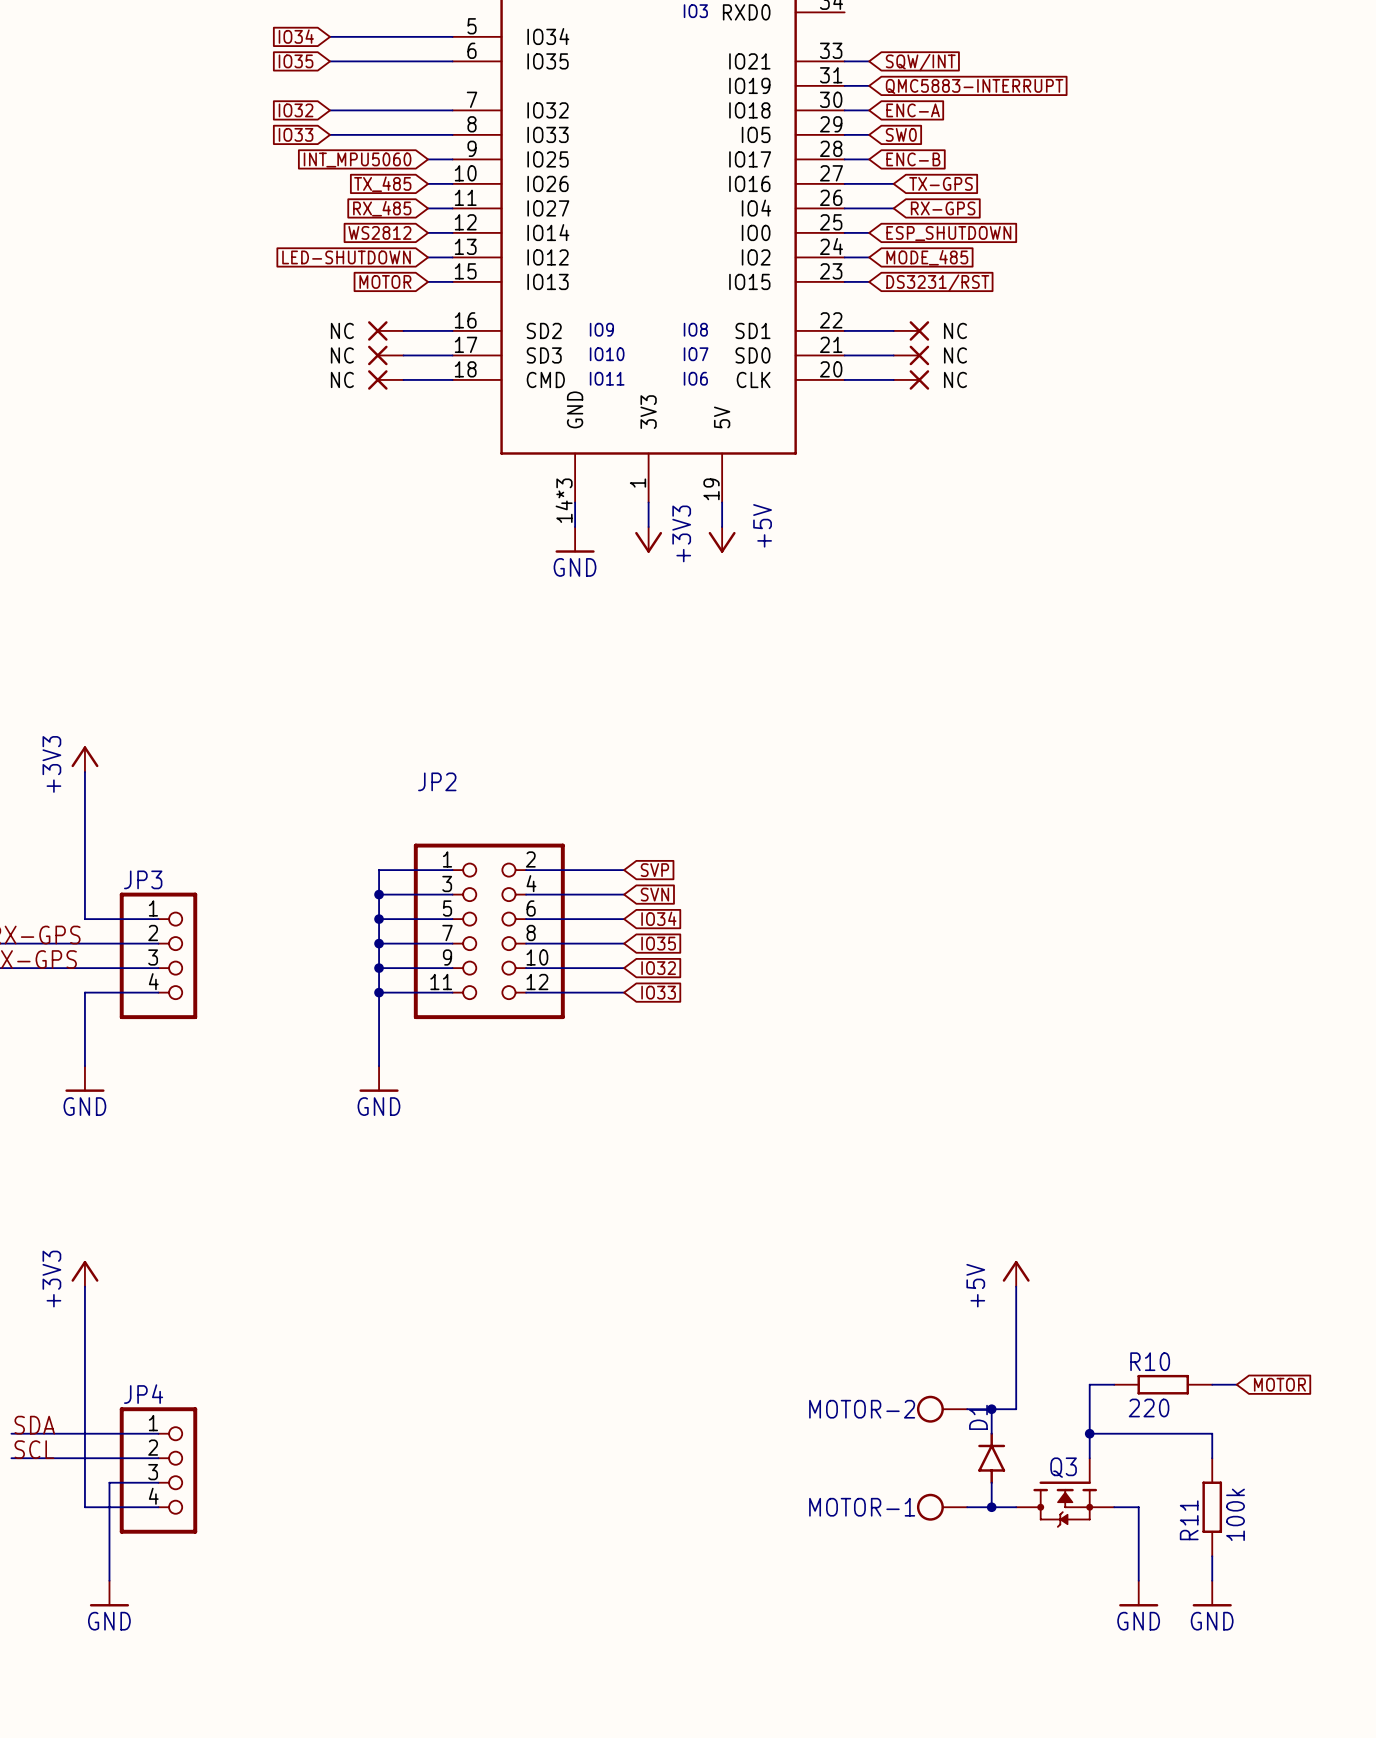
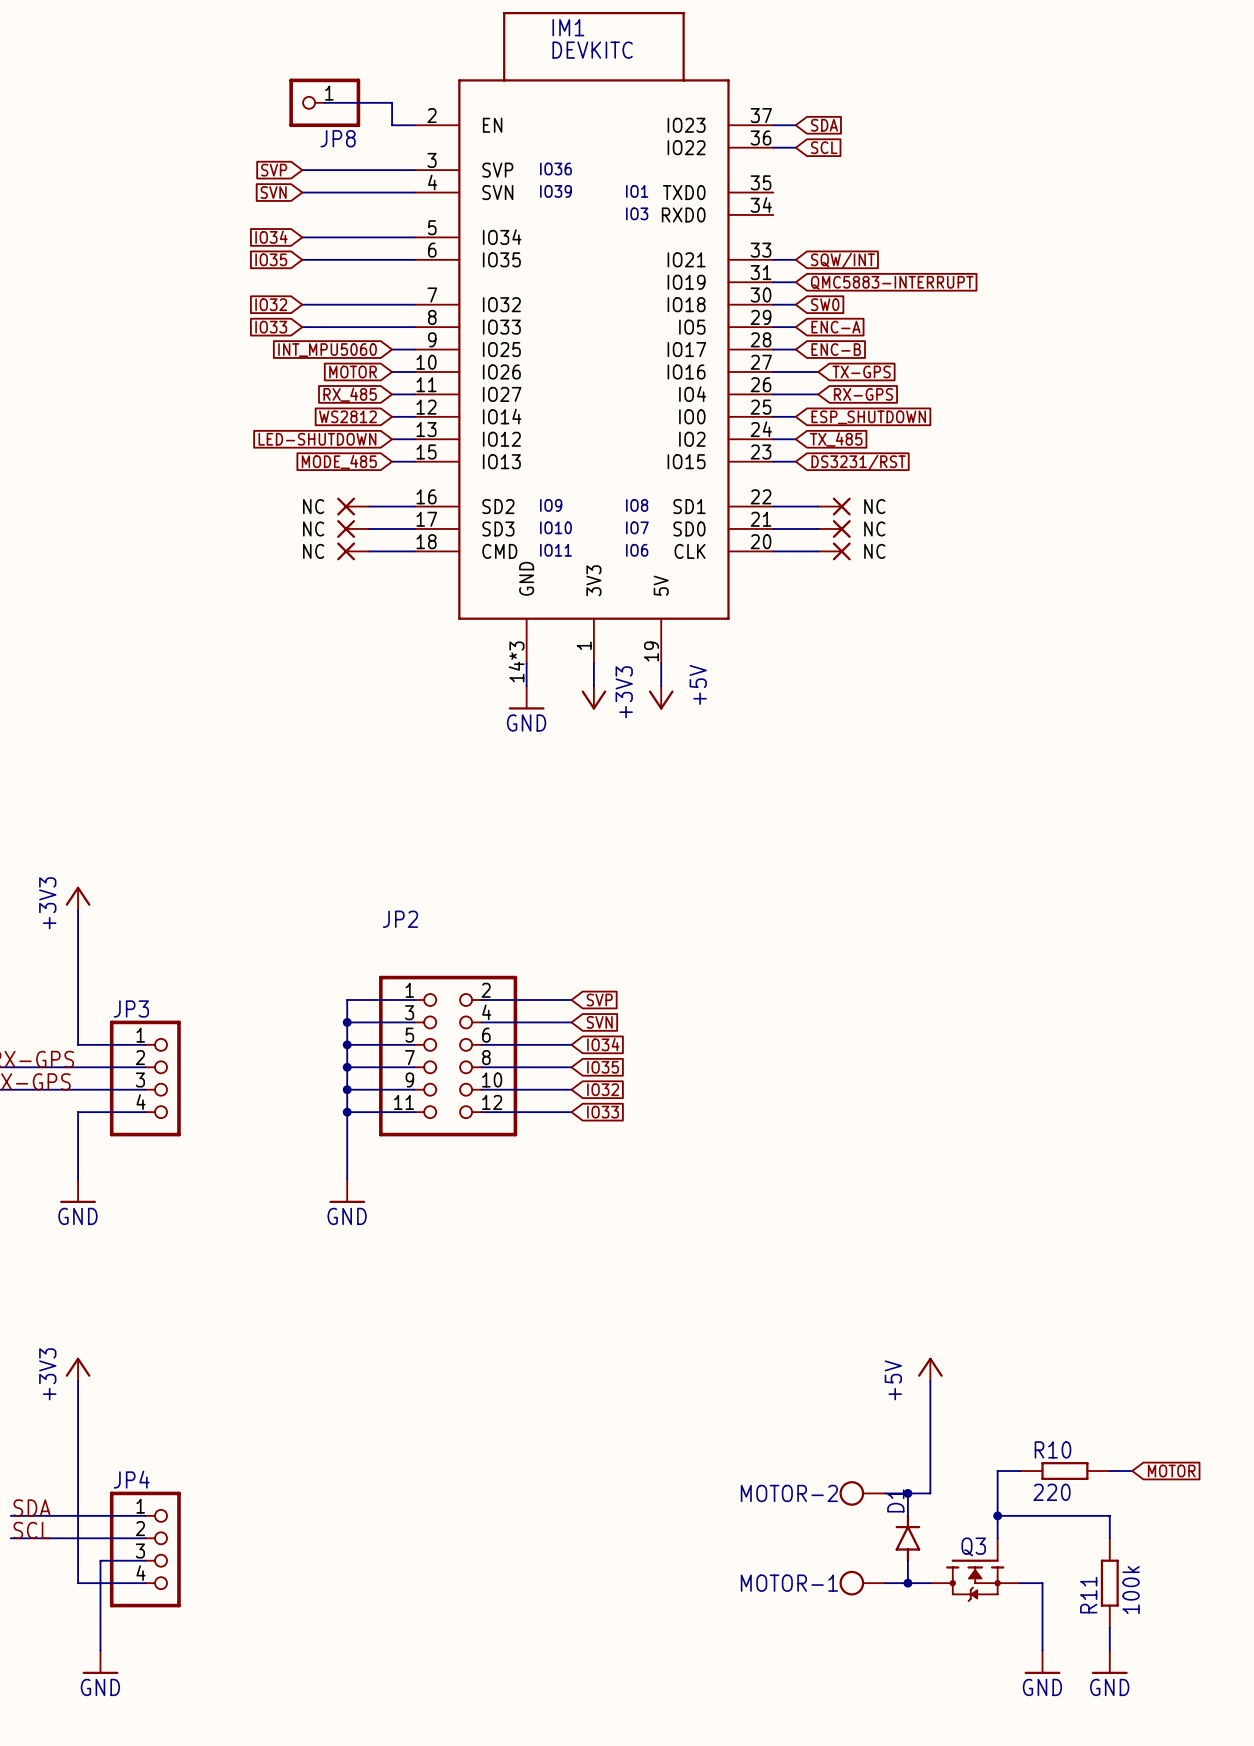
global label: ENC-A (913, 110) -> SW0 (825, 304)
global label: SW0 (901, 134) -> ENC-A (836, 327)
global label: TX_485 (382, 184) -> MOTOR (353, 371)
global label: MODE_485 (927, 257) -> TX_485 (836, 439)
global label: MOTOR (385, 281) -> MODE_485 (339, 461)

